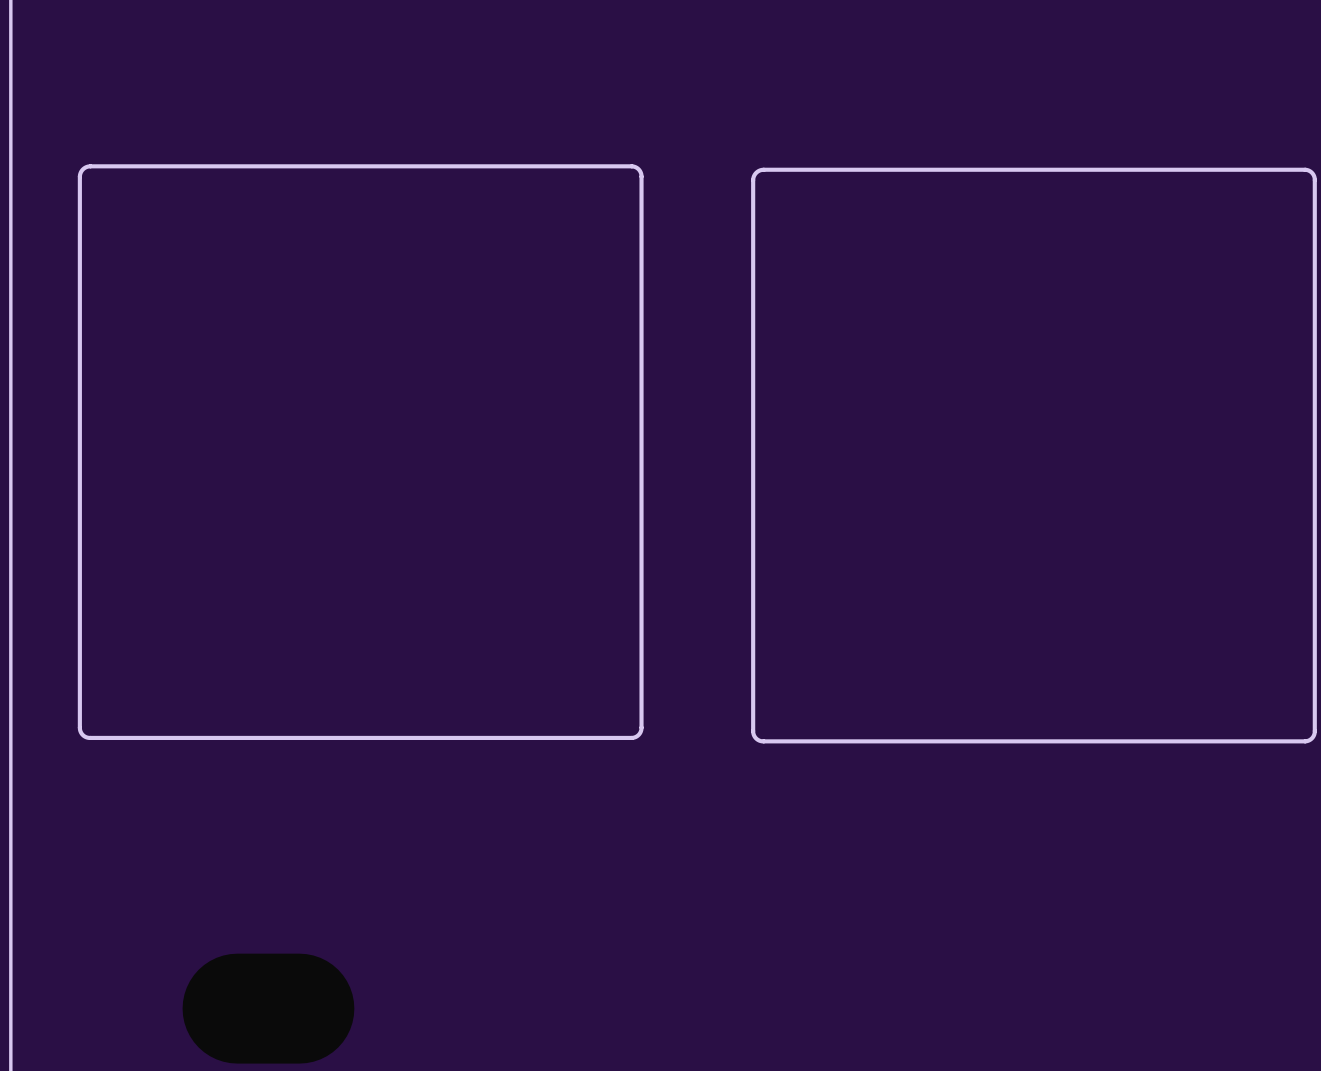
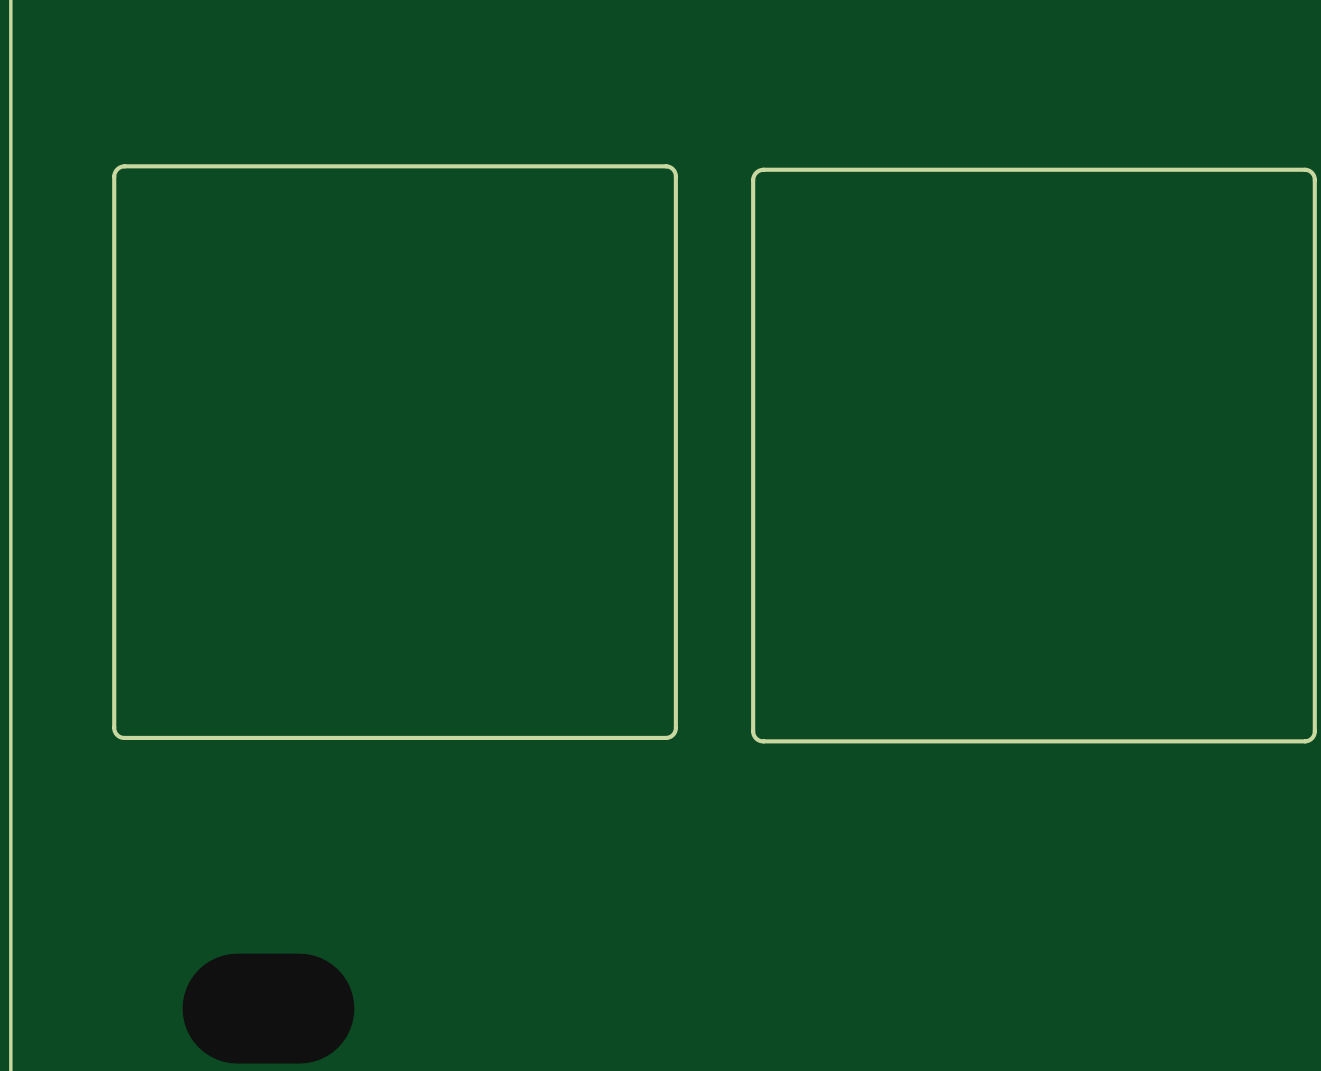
drawing position: (360, 452) -> (395, 452)

